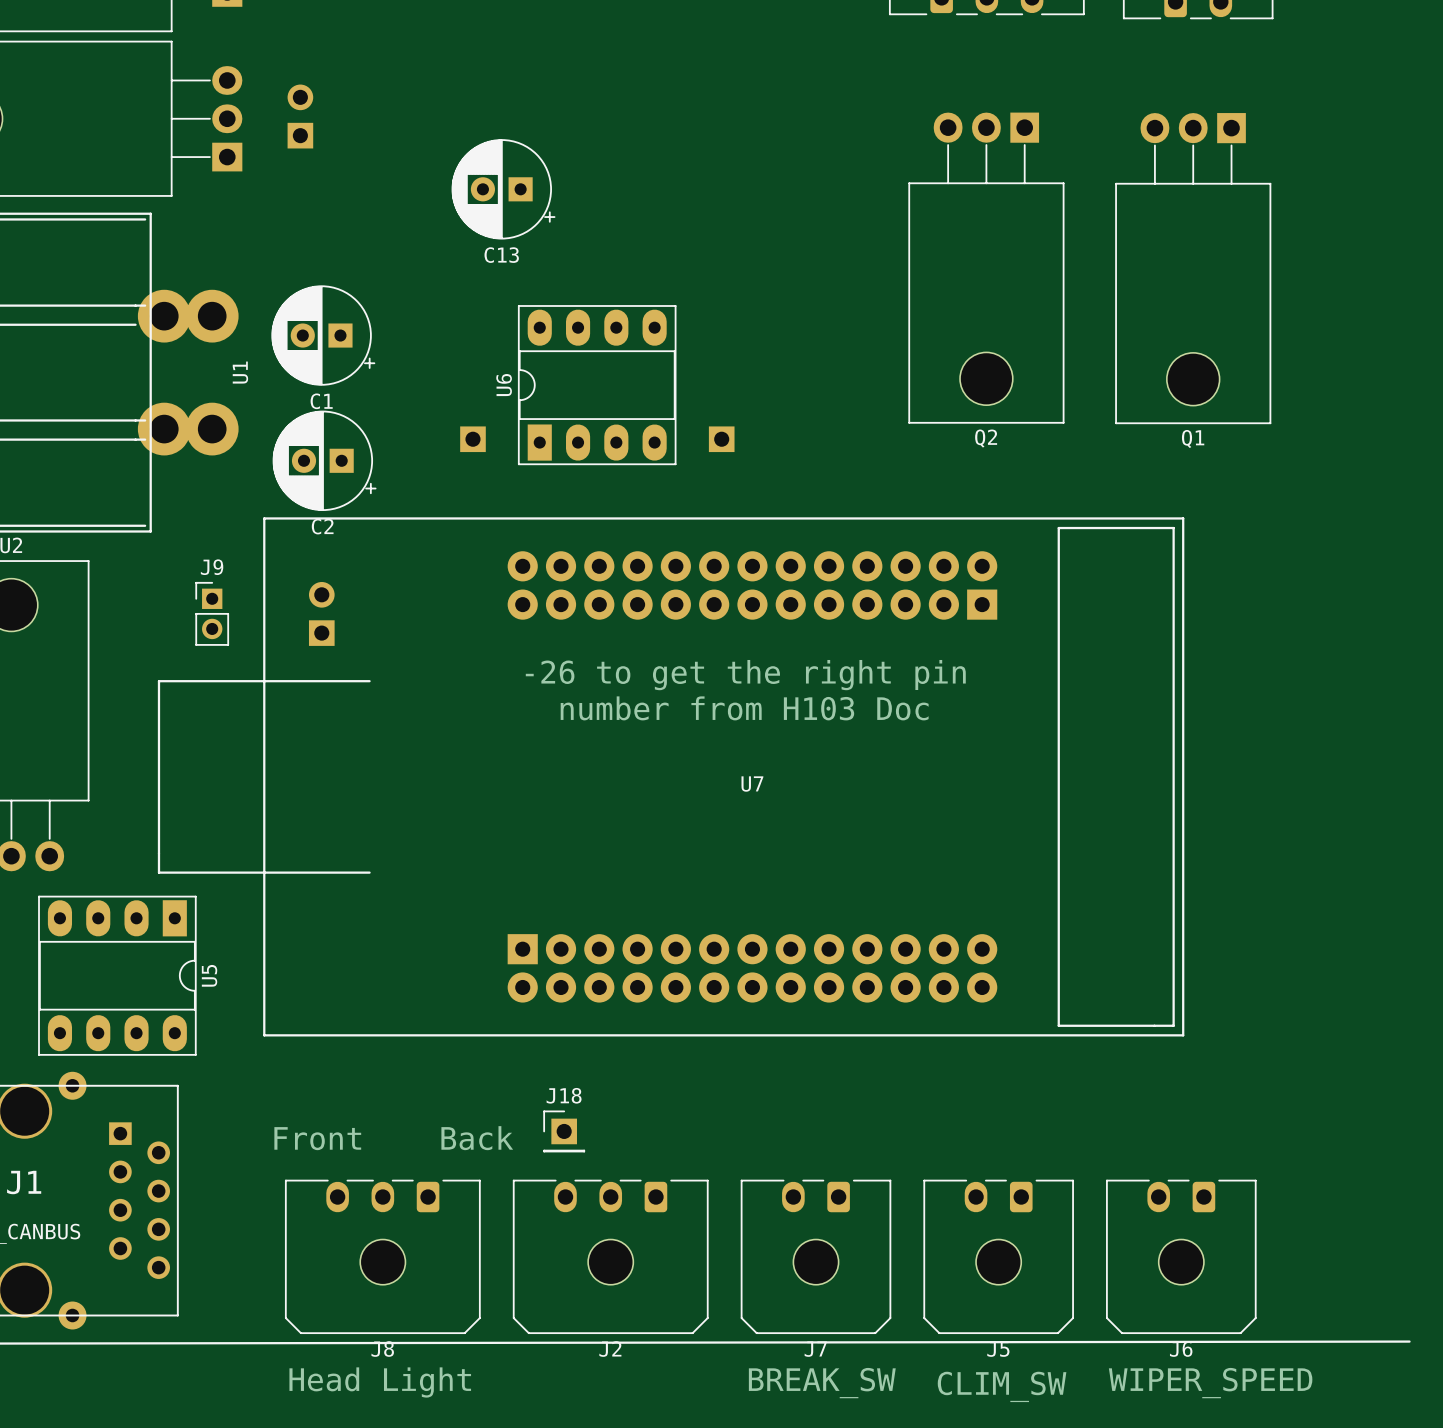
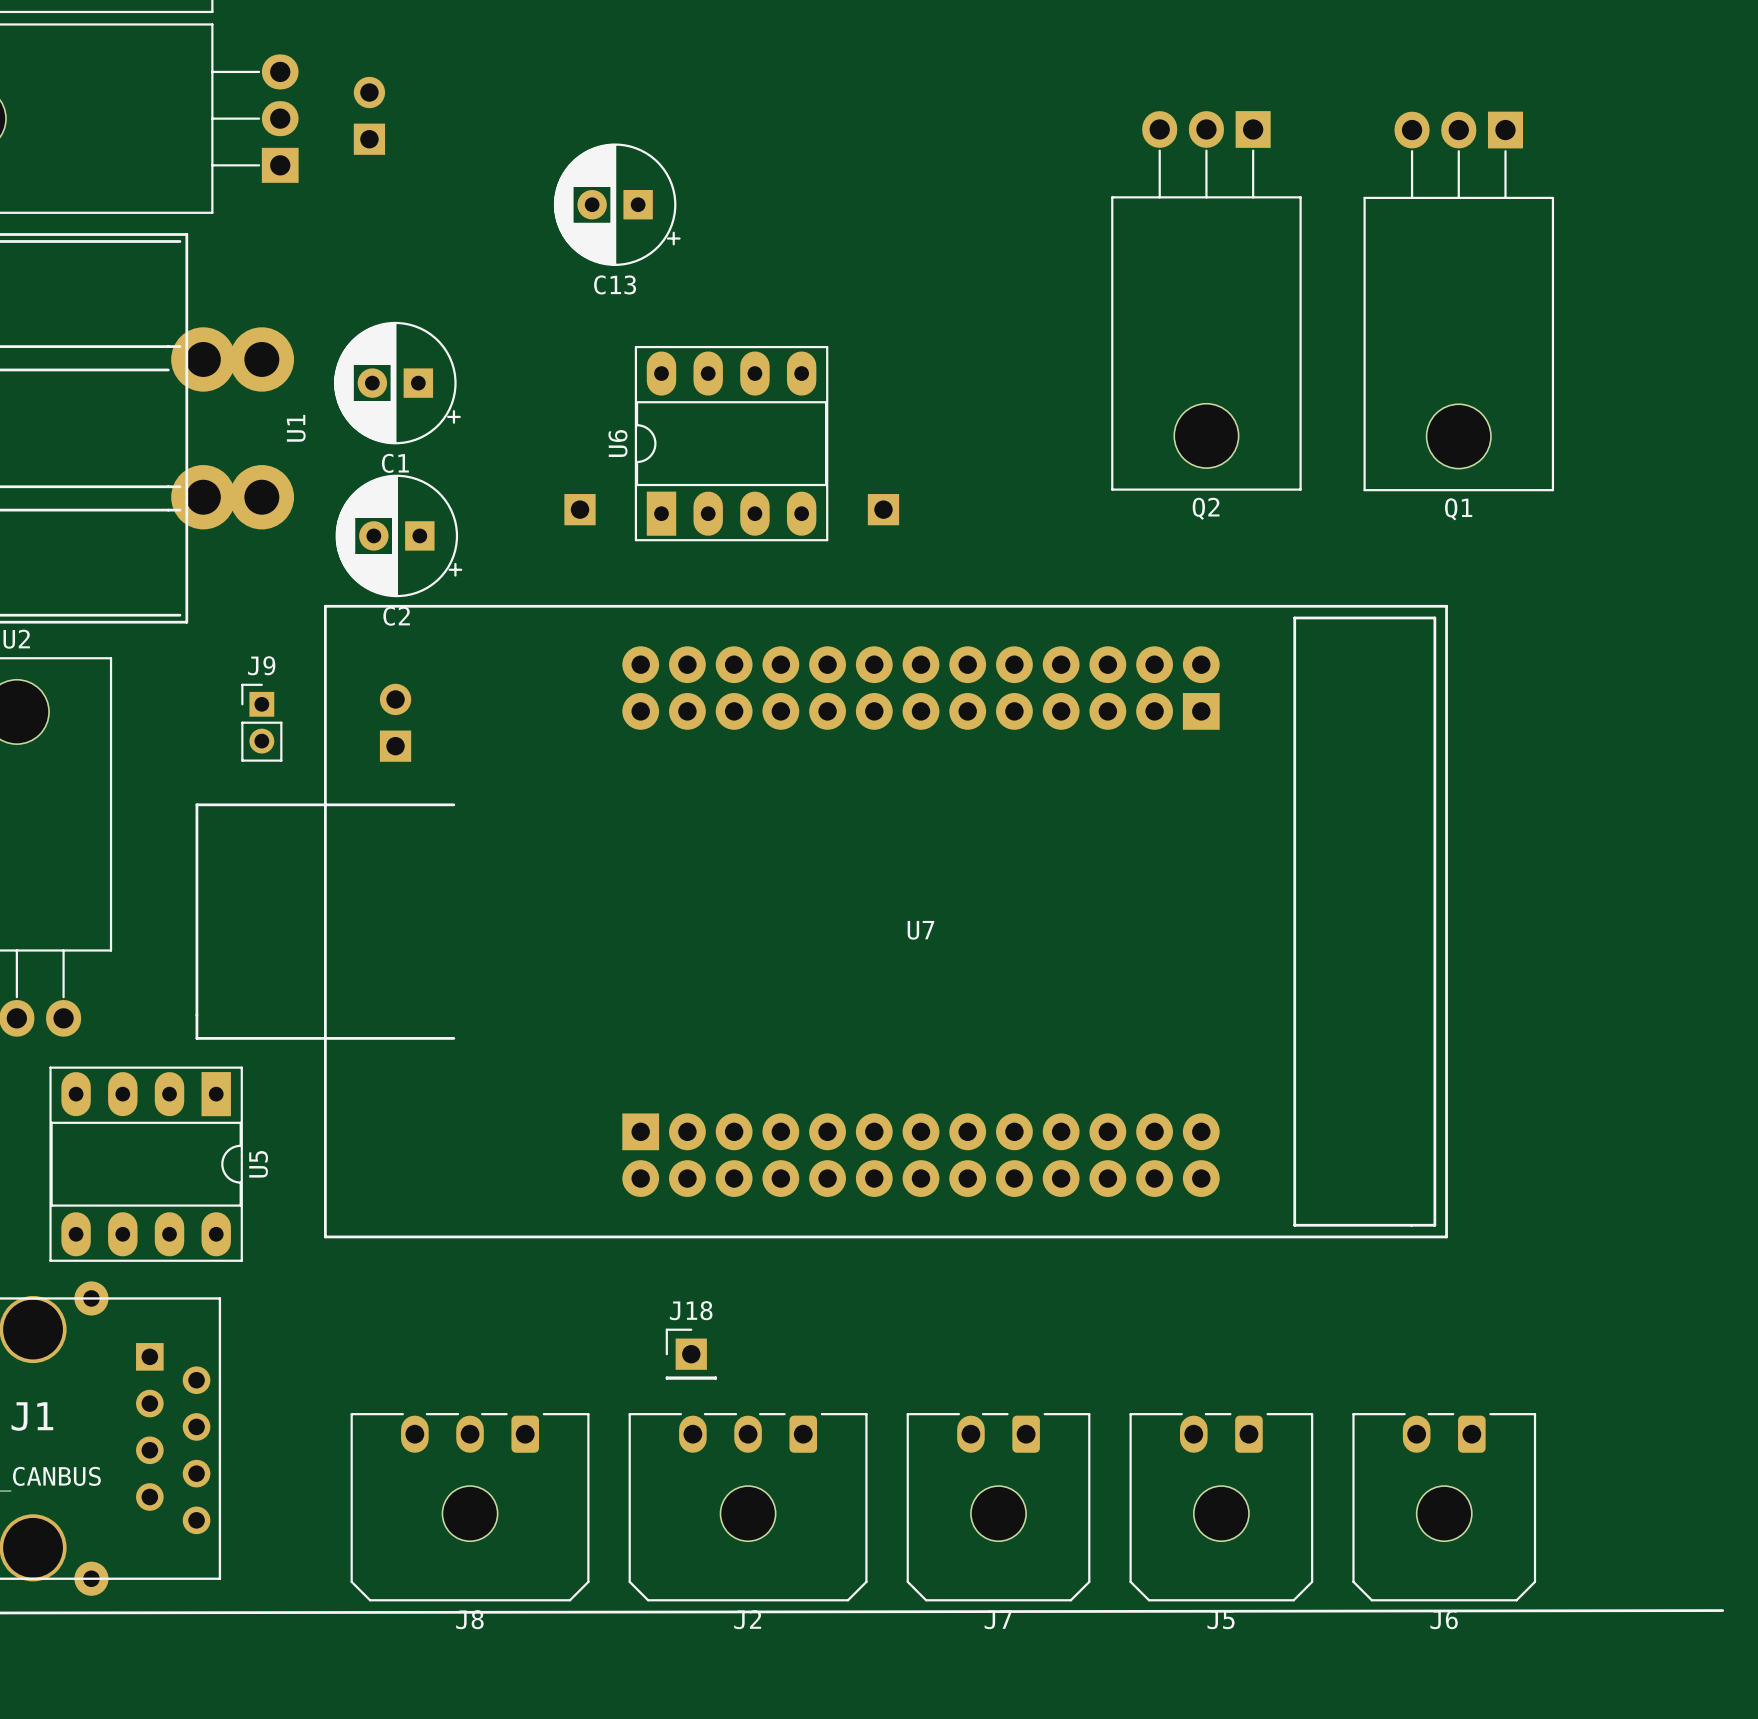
text: -26 to get the right pin (745, 675) -> none
text: number from H103 Doc (744, 708) -> none
text: Front Back (393, 1138) -> none
text: Head Light (380, 1382) -> none
text: BREAK_SW (822, 1383) -> none
text: WIPER_SPEED (1210, 1383) -> none
text: CLIM_SW (1002, 1386) -> none

